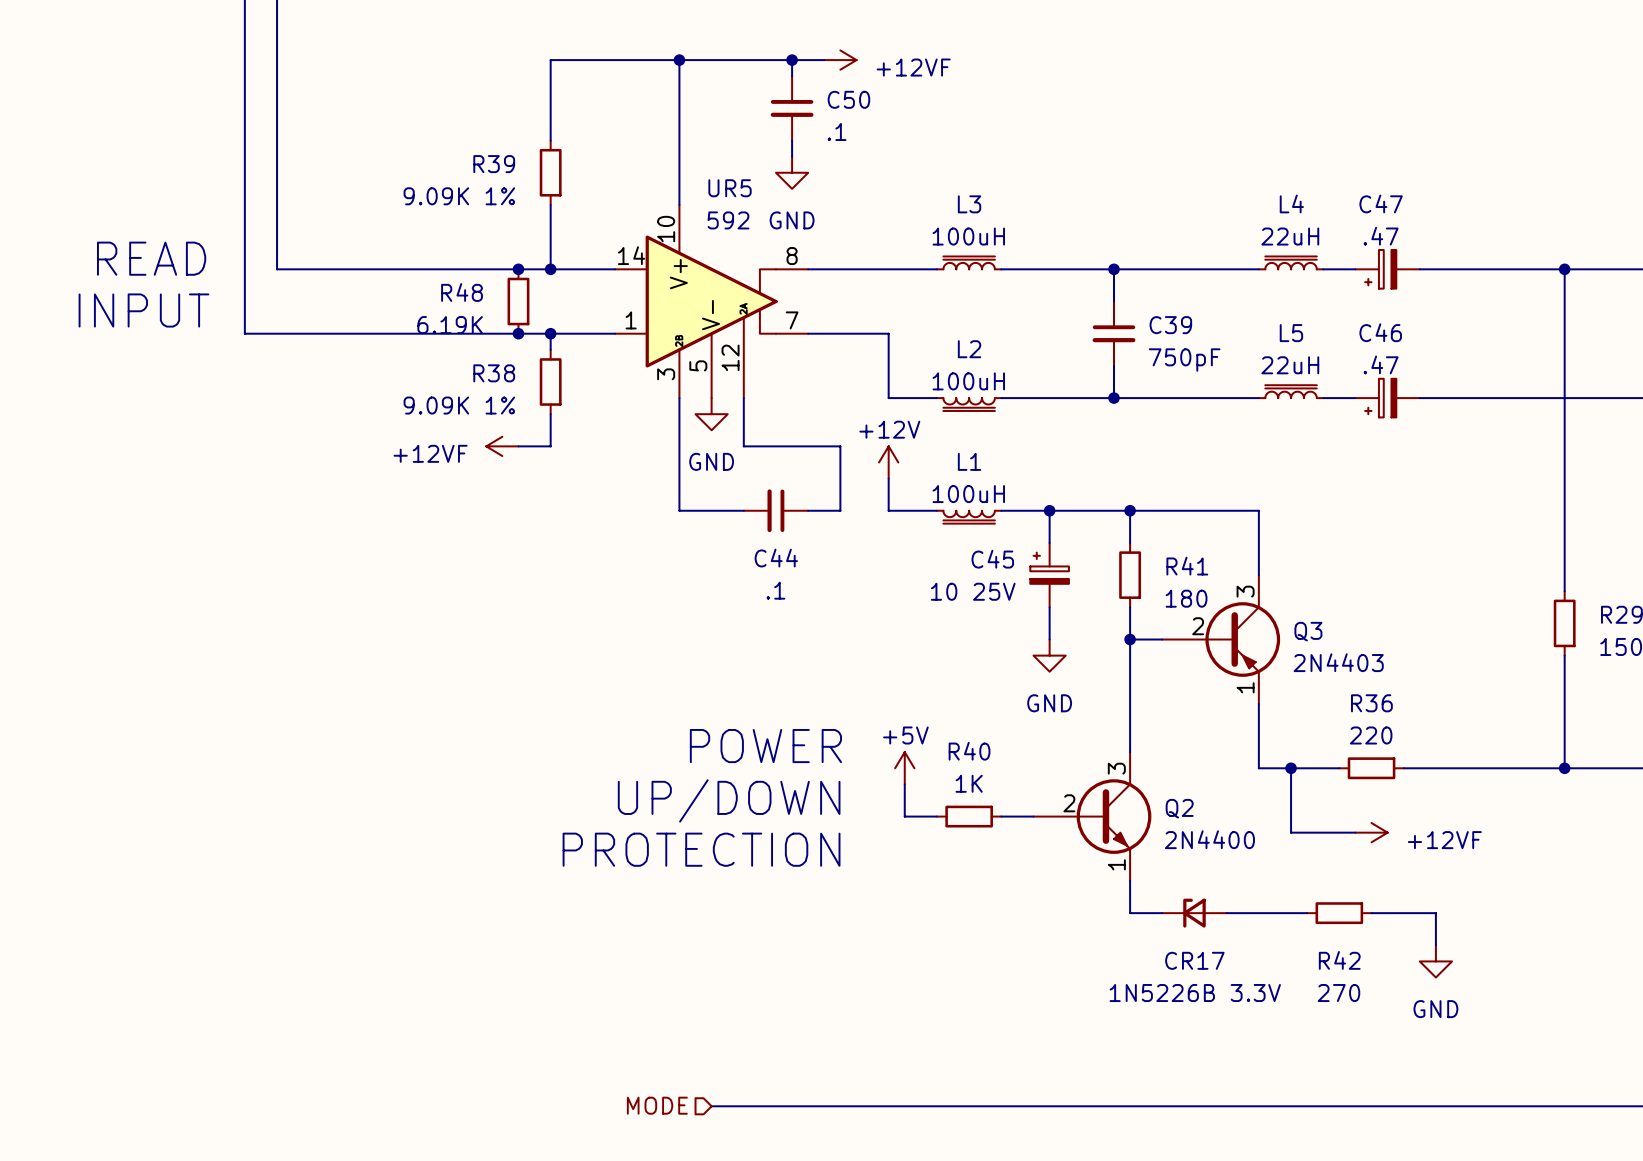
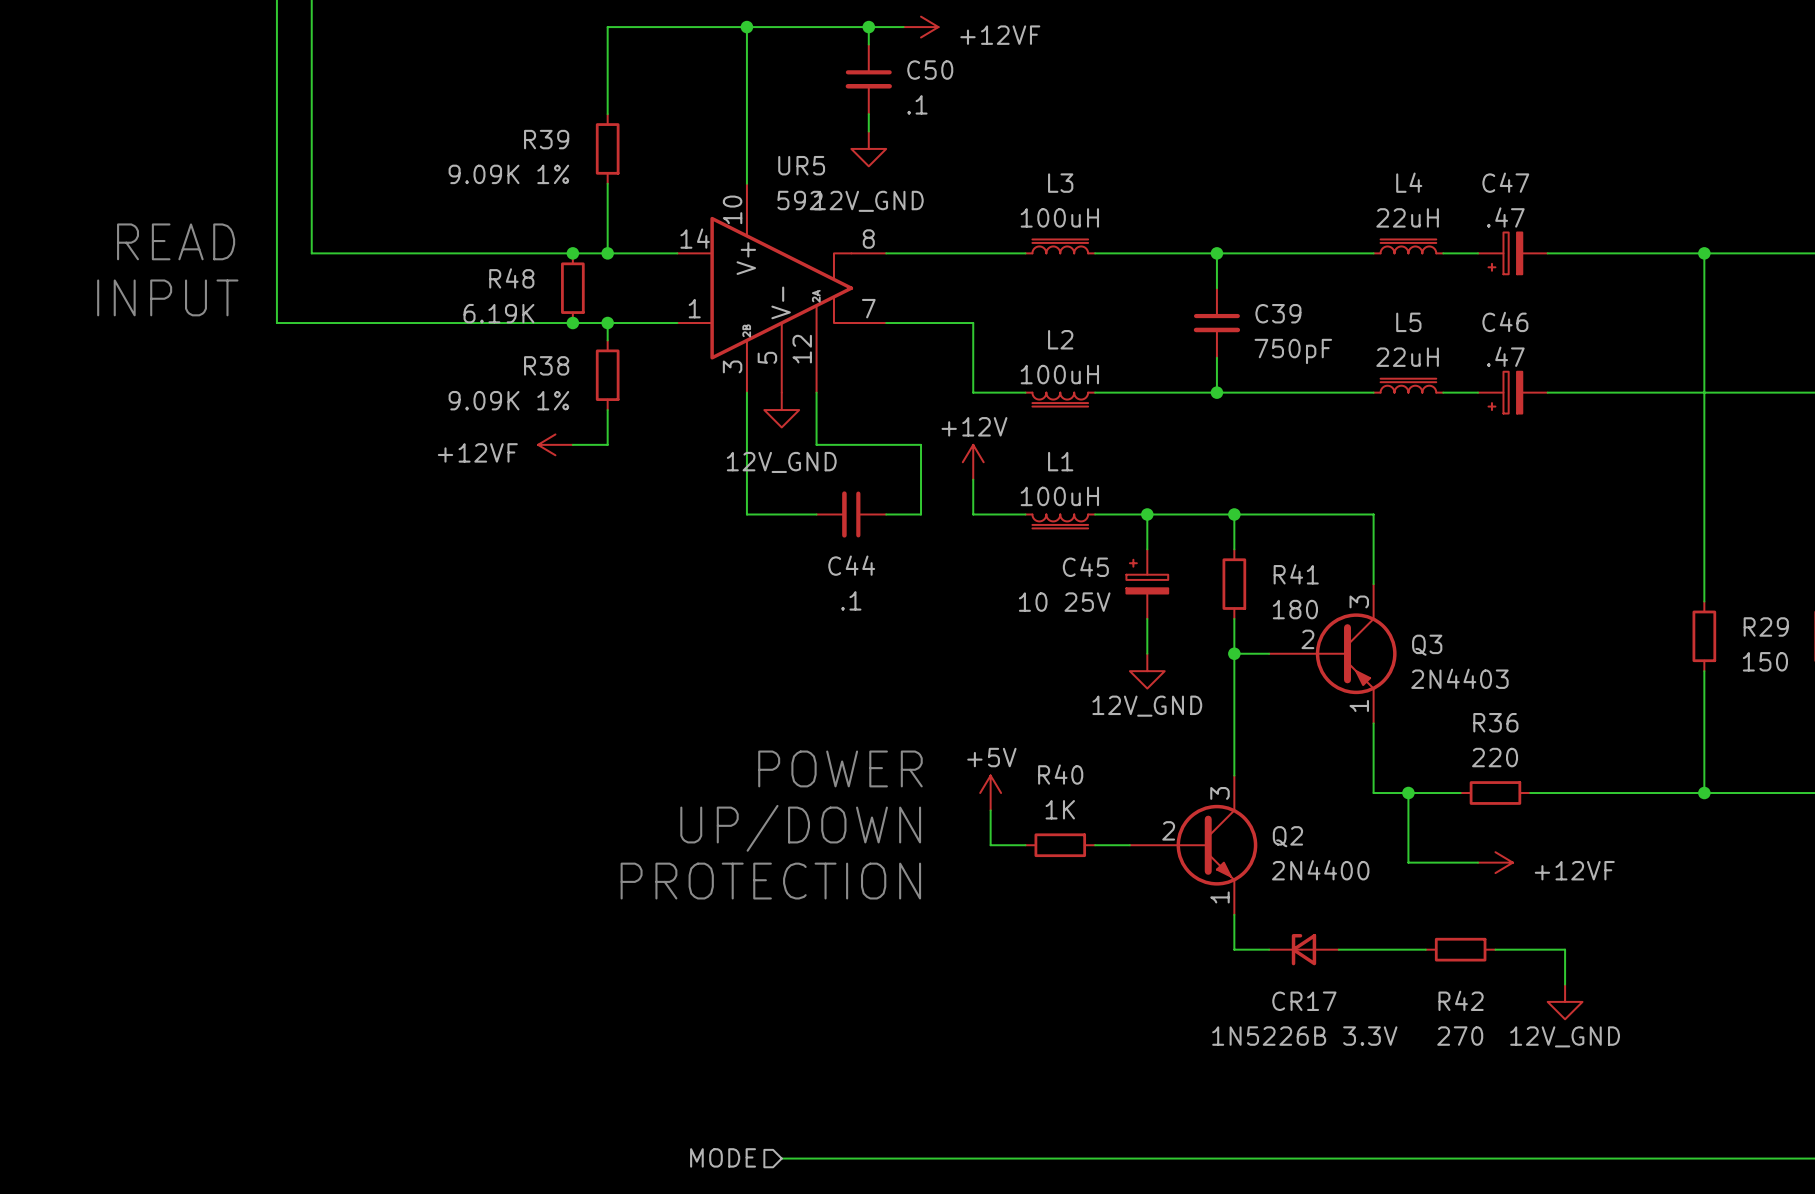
power symbol: GND (792, 172) -> 12V_GND (868, 148)
power symbol: GND (711, 414) -> 12V_GND (781, 410)
power symbol: GND (1049, 655) -> 12V_GND (1147, 671)
power symbol: GND (1435, 961) -> 12V_GND (1565, 1001)

